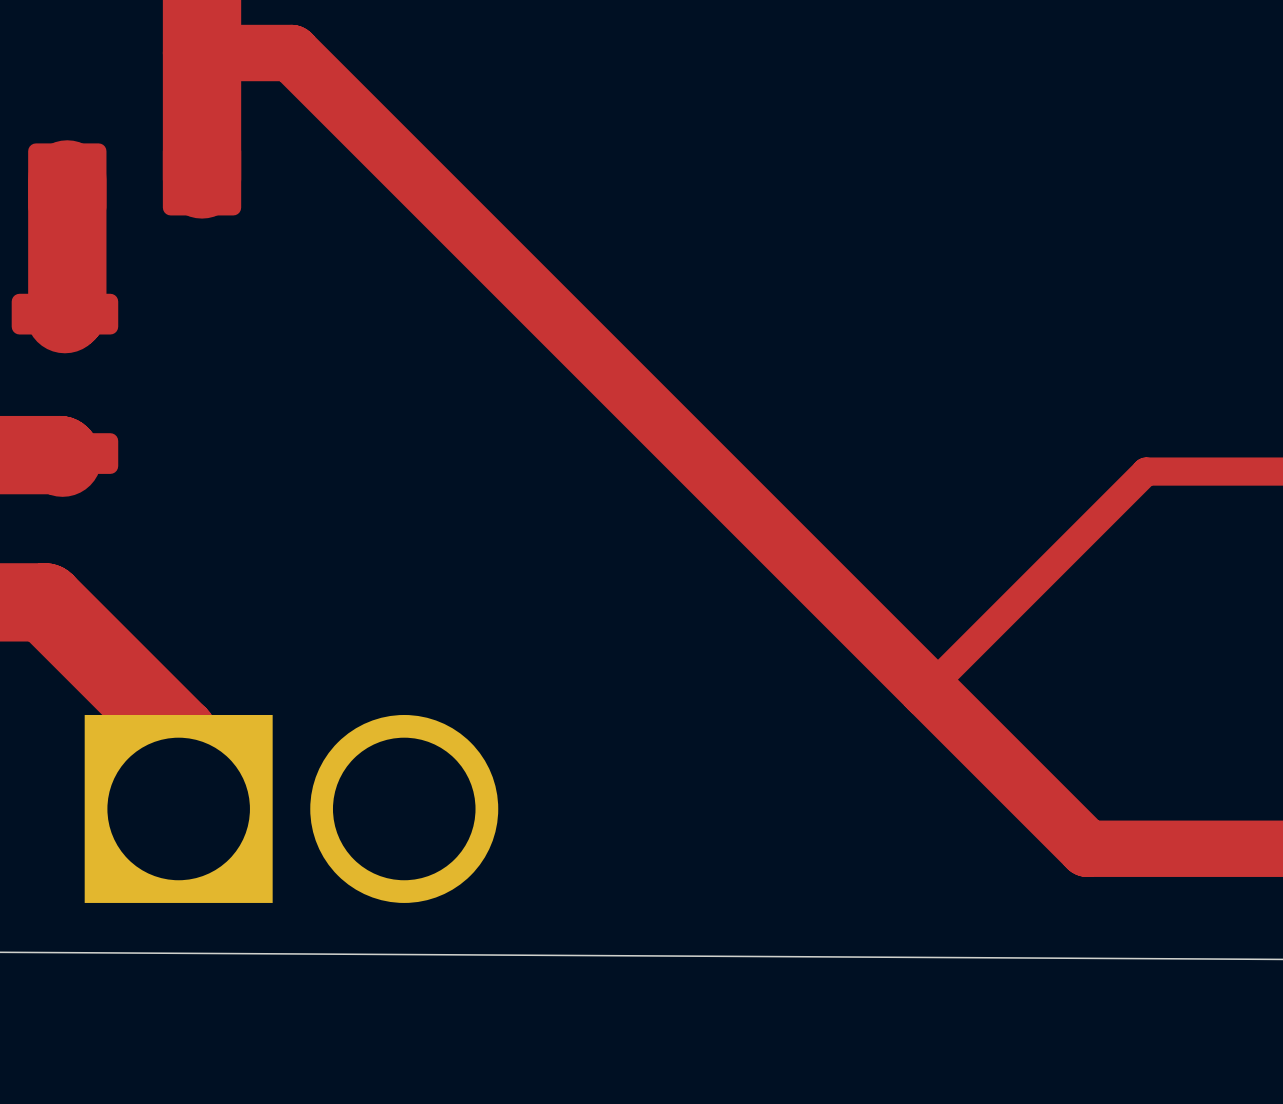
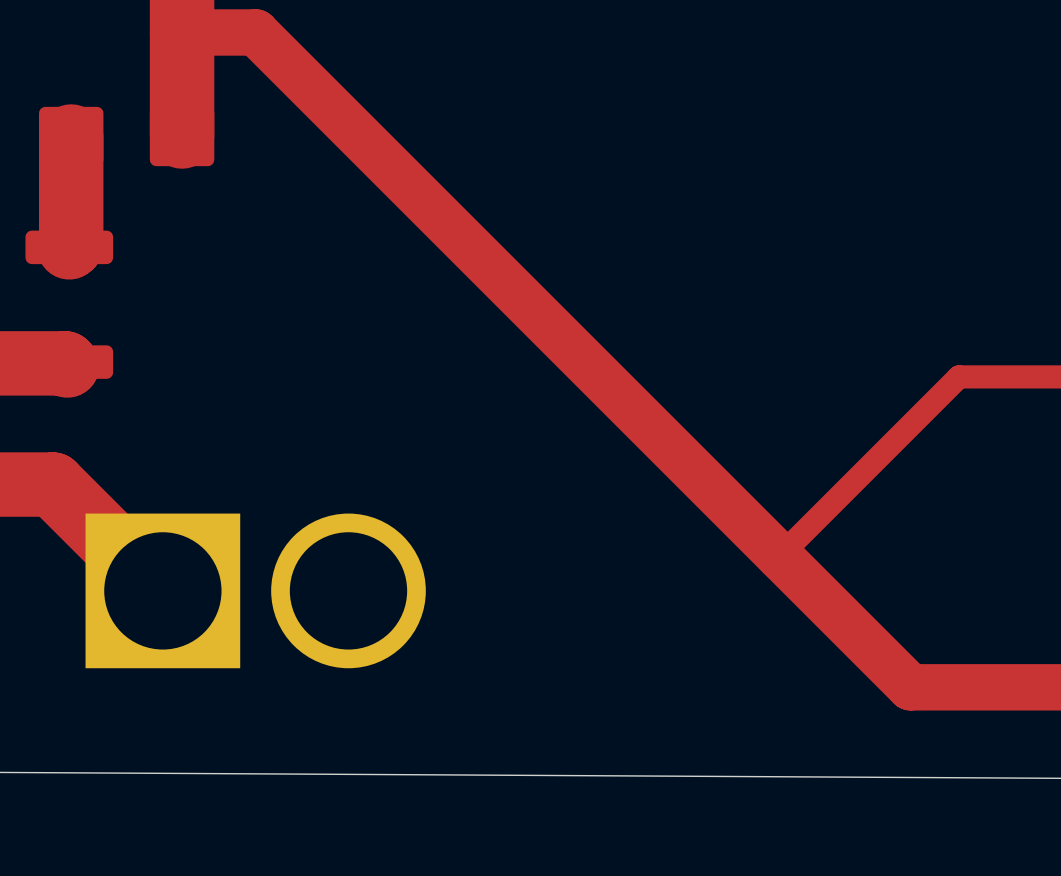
part position: (291, 808) -> (255, 590)

